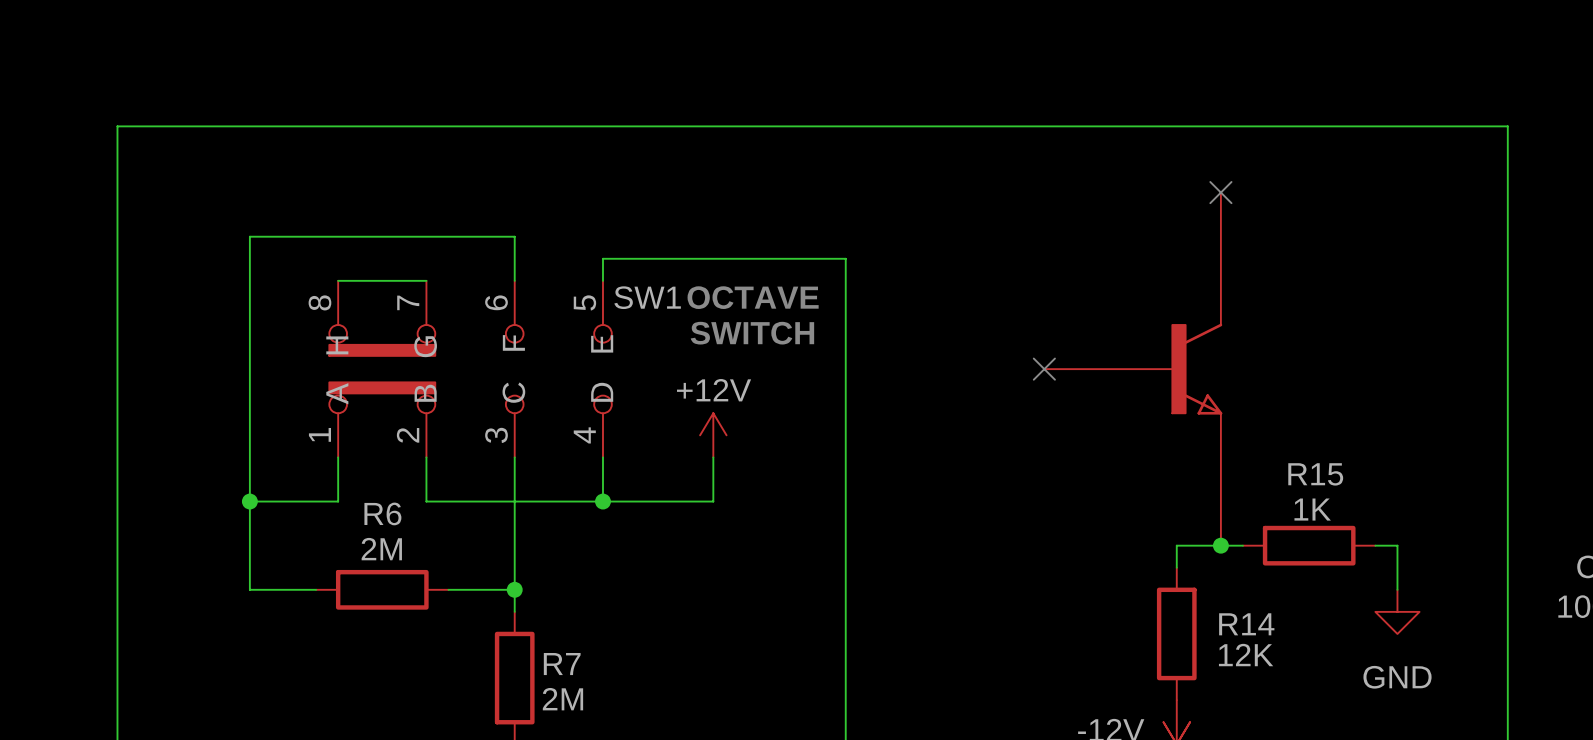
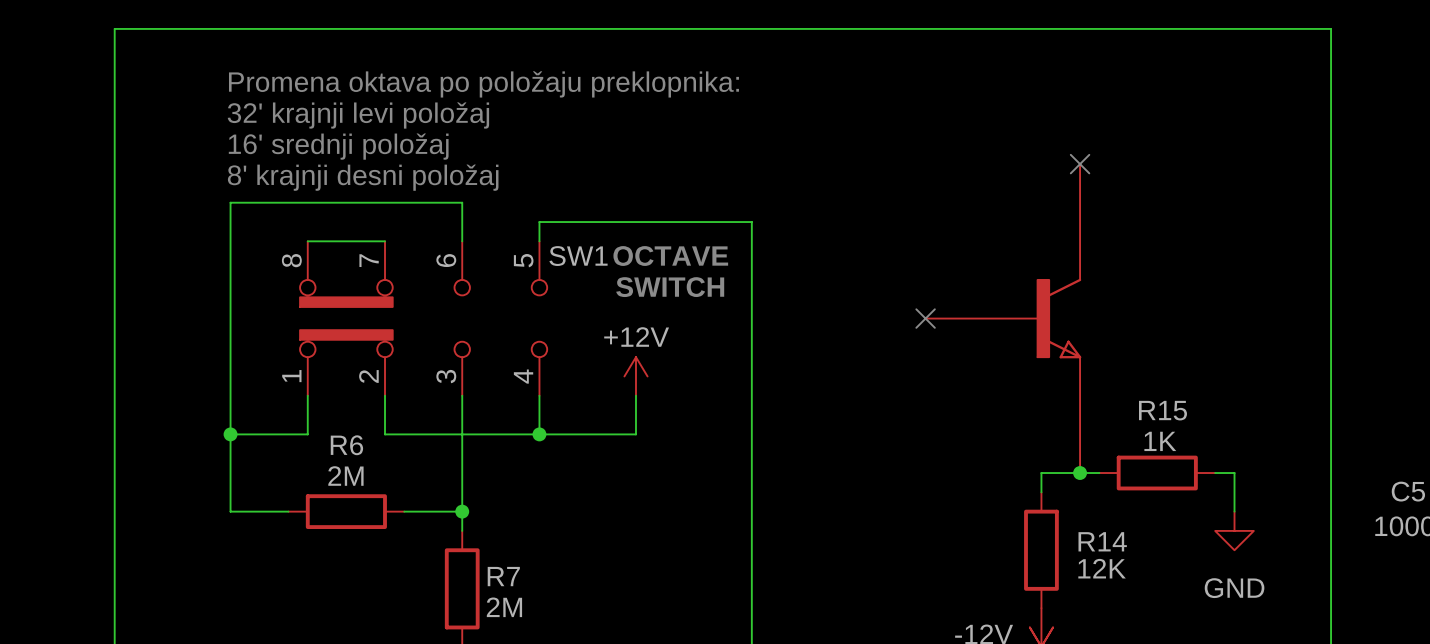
text: none -> Promena oktava po položaju preklopnika: (483, 84)
wire: (117, 126) (1507, 126) -> (114, 106) (114, 28) (1331, 28) (1331, 106)
text: none -> 32' krajnji levi položaj (358, 115)
text: none -> 16' srednji položaj (338, 146)
text: none -> 8' krajnji desni položaj (363, 177)
SW1 pin name: F (513, 342) -> none
SW1 pin name: E (602, 343) -> none
SW1 pin name: H (337, 345) -> none
SW1 pin name: G (425, 346) -> none
SW1 pin name: C (513, 392) -> none
SW1 pin name: D (602, 392) -> none
SW1 pin name: A (337, 393) -> none
SW1 pin name: B (425, 393) -> none

